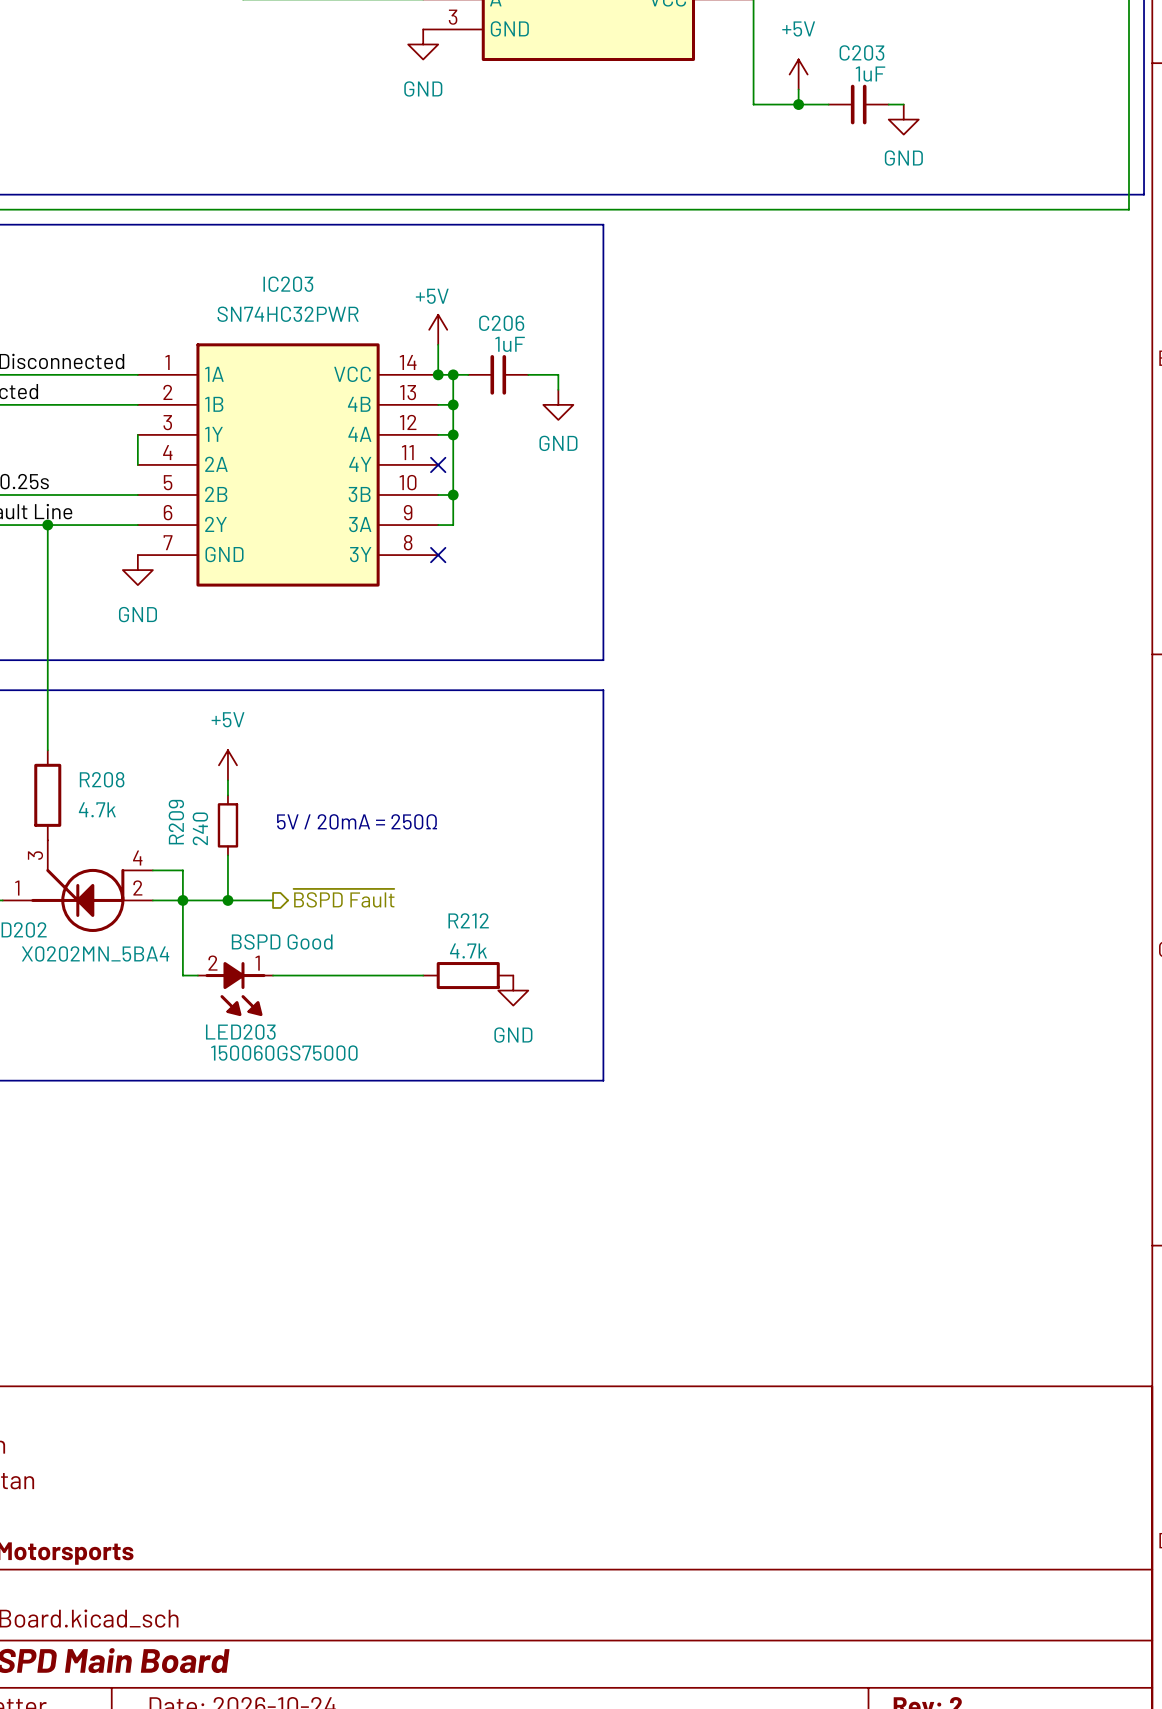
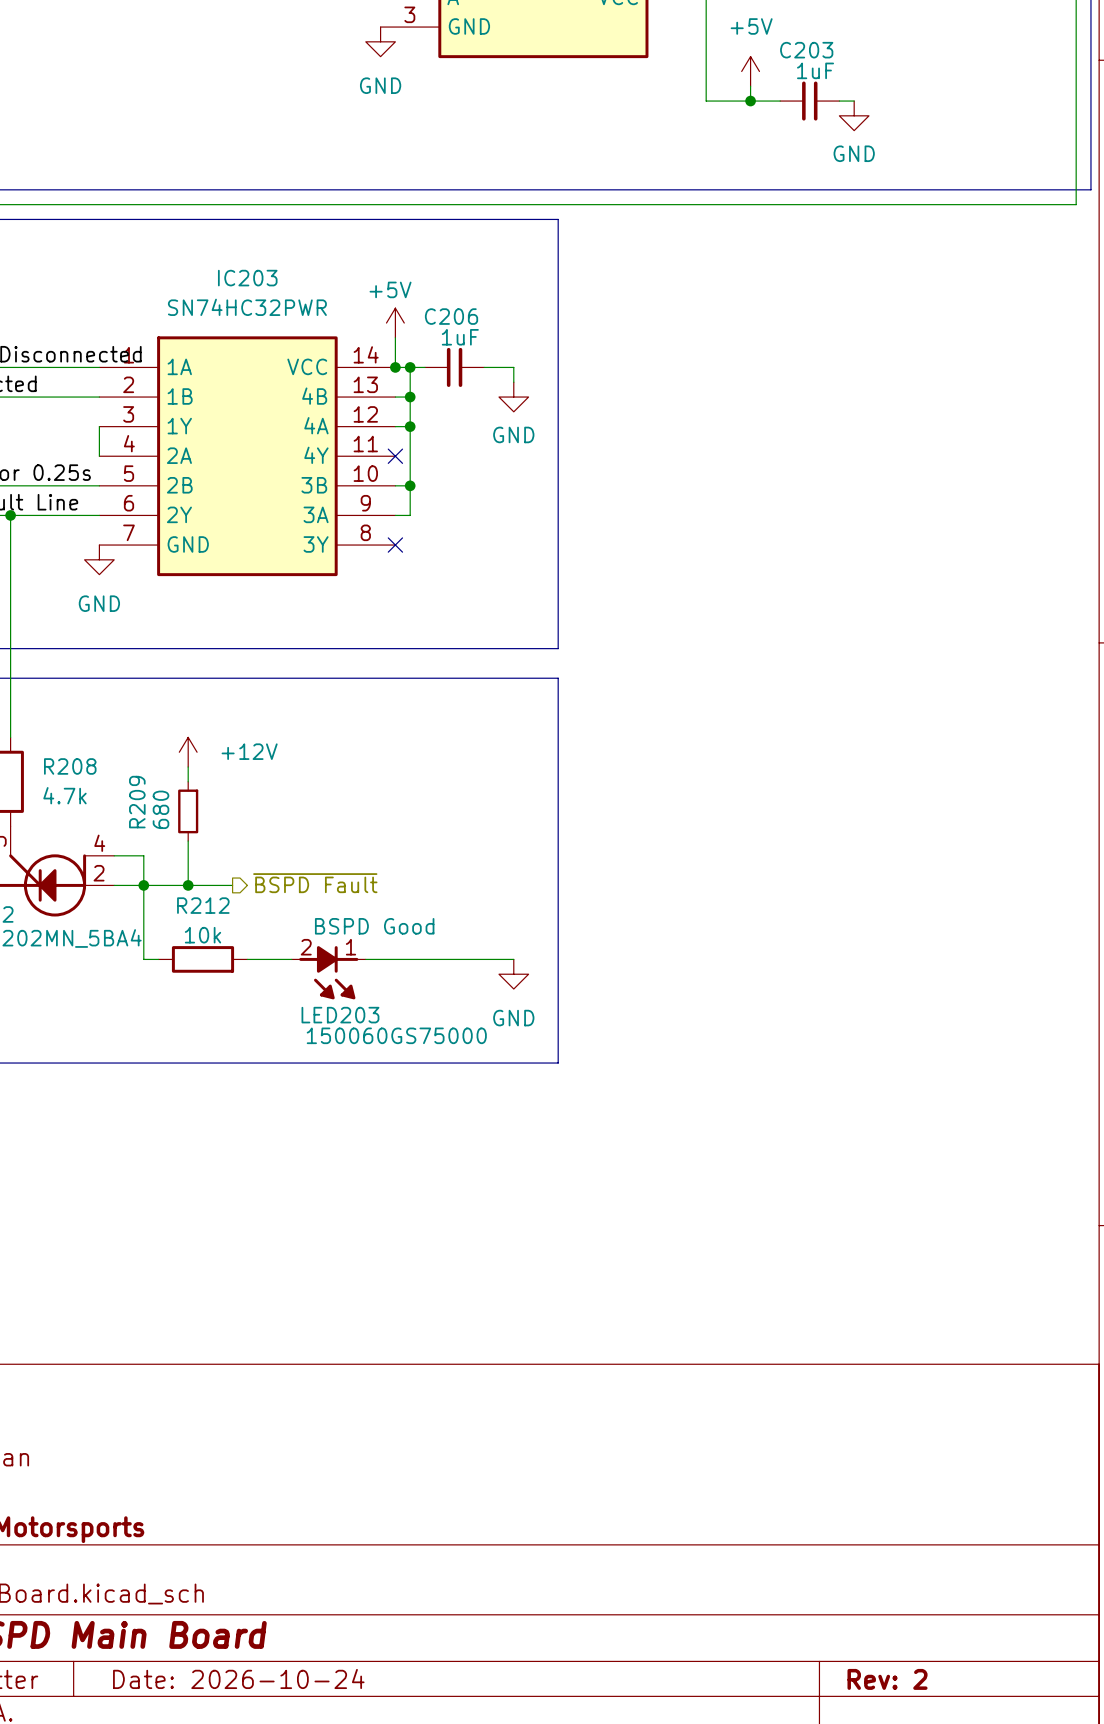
power symbol: +5V (227, 765) -> +12V (188, 752)
text: 5V / 20mA = 250Ω (357, 821) -> none
R209 value: 240 (200, 828) -> 680 (161, 809)
R212 value: 4.7k (468, 950) -> 10k (202, 935)
wire: none -> (380, 959) (513, 959)
R212 position: (468, 975) -> (202, 959)
LED203 position: (235, 989) -> (328, 972)
power symbol position: GND (513, 990) -> GND (513, 974)

